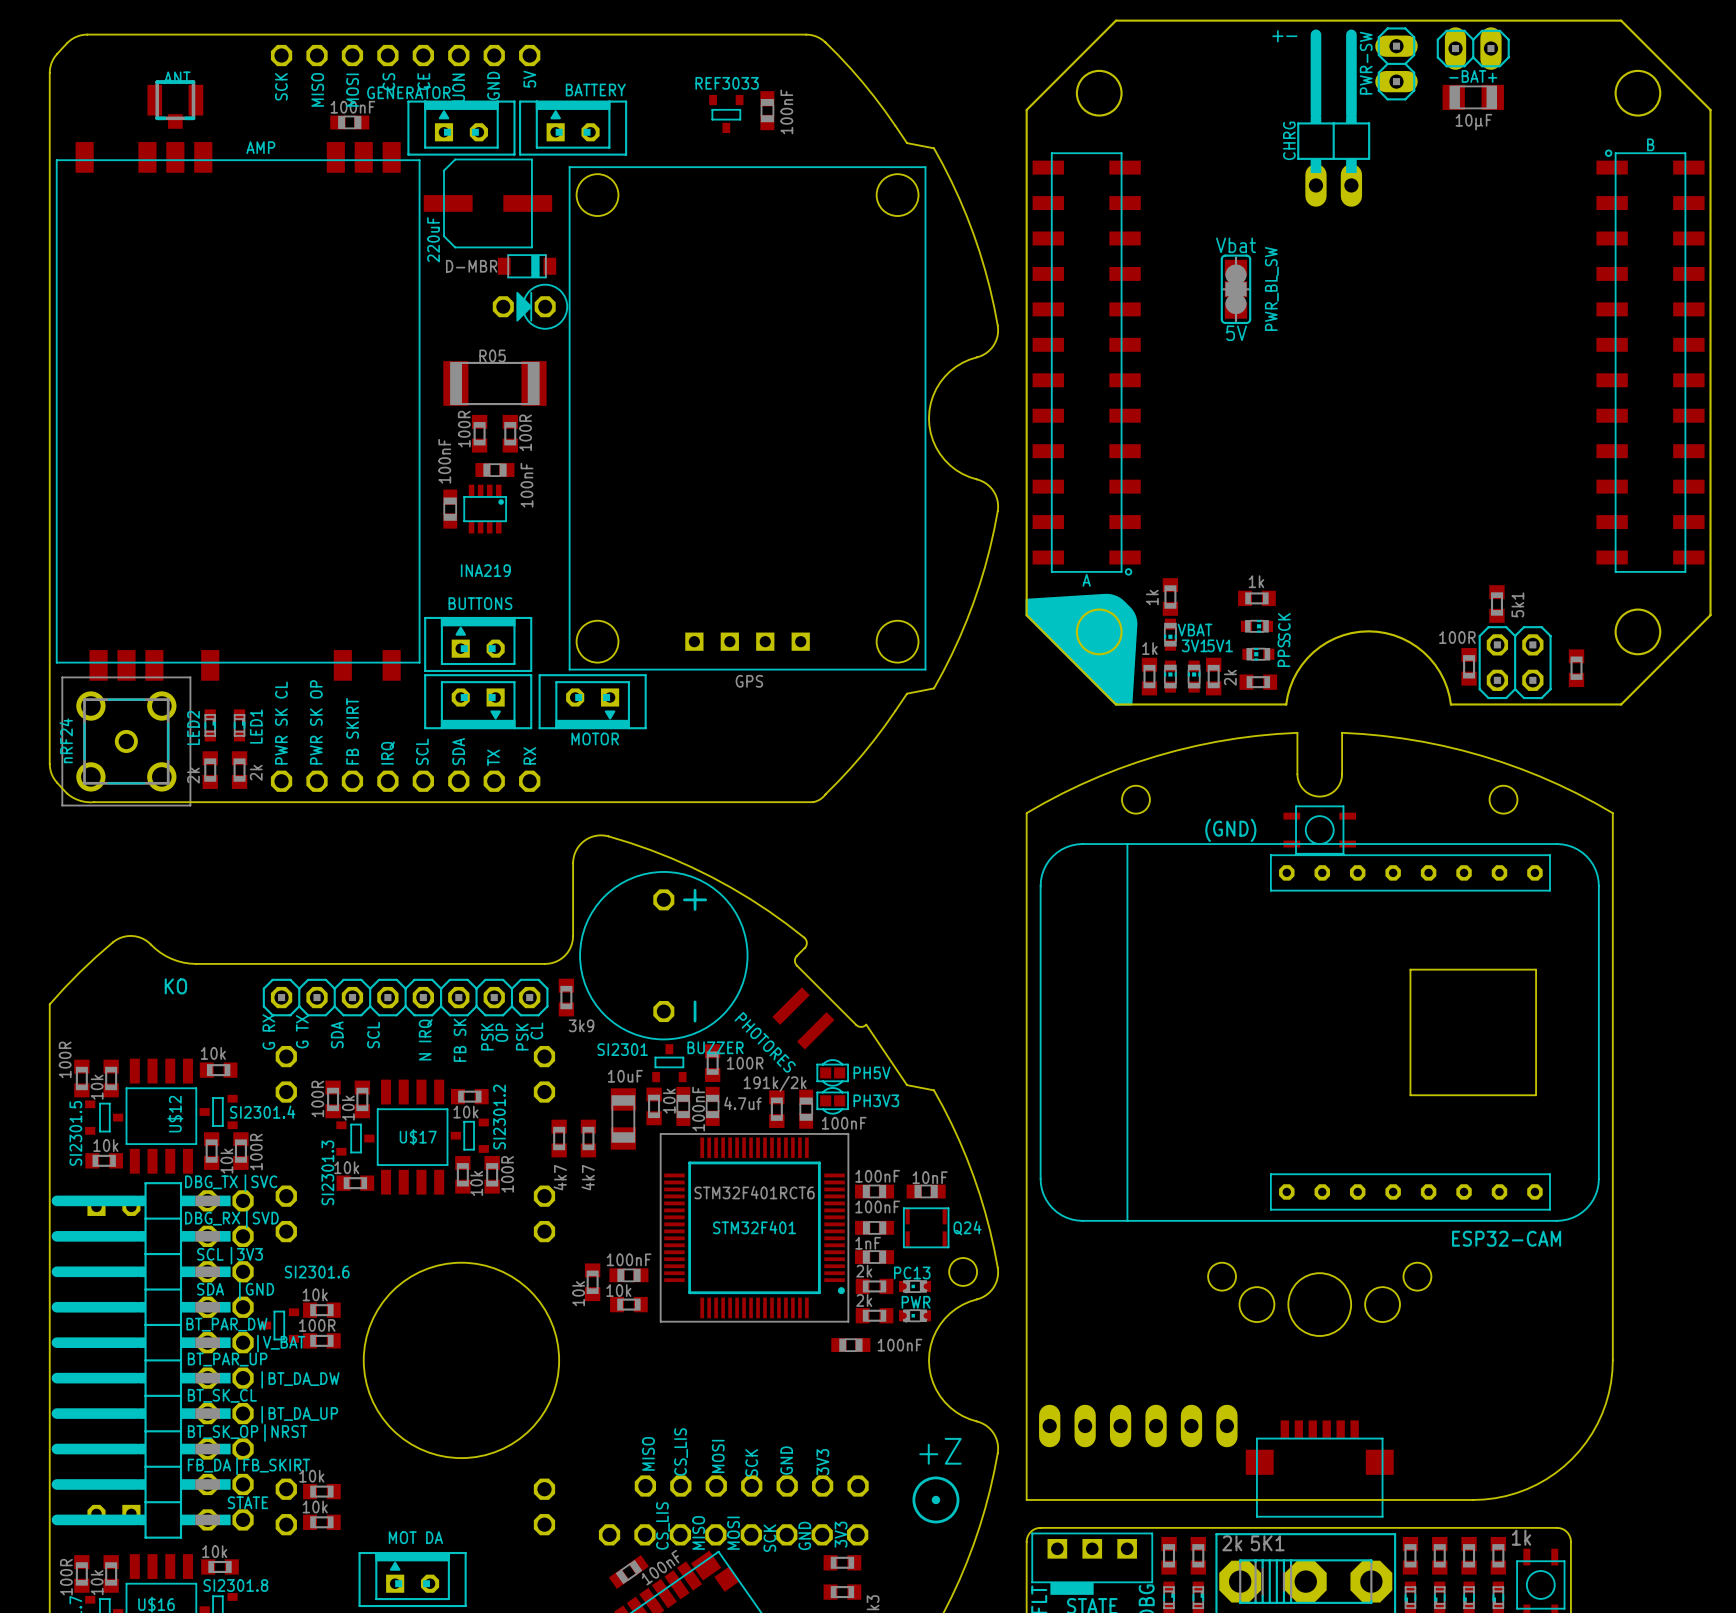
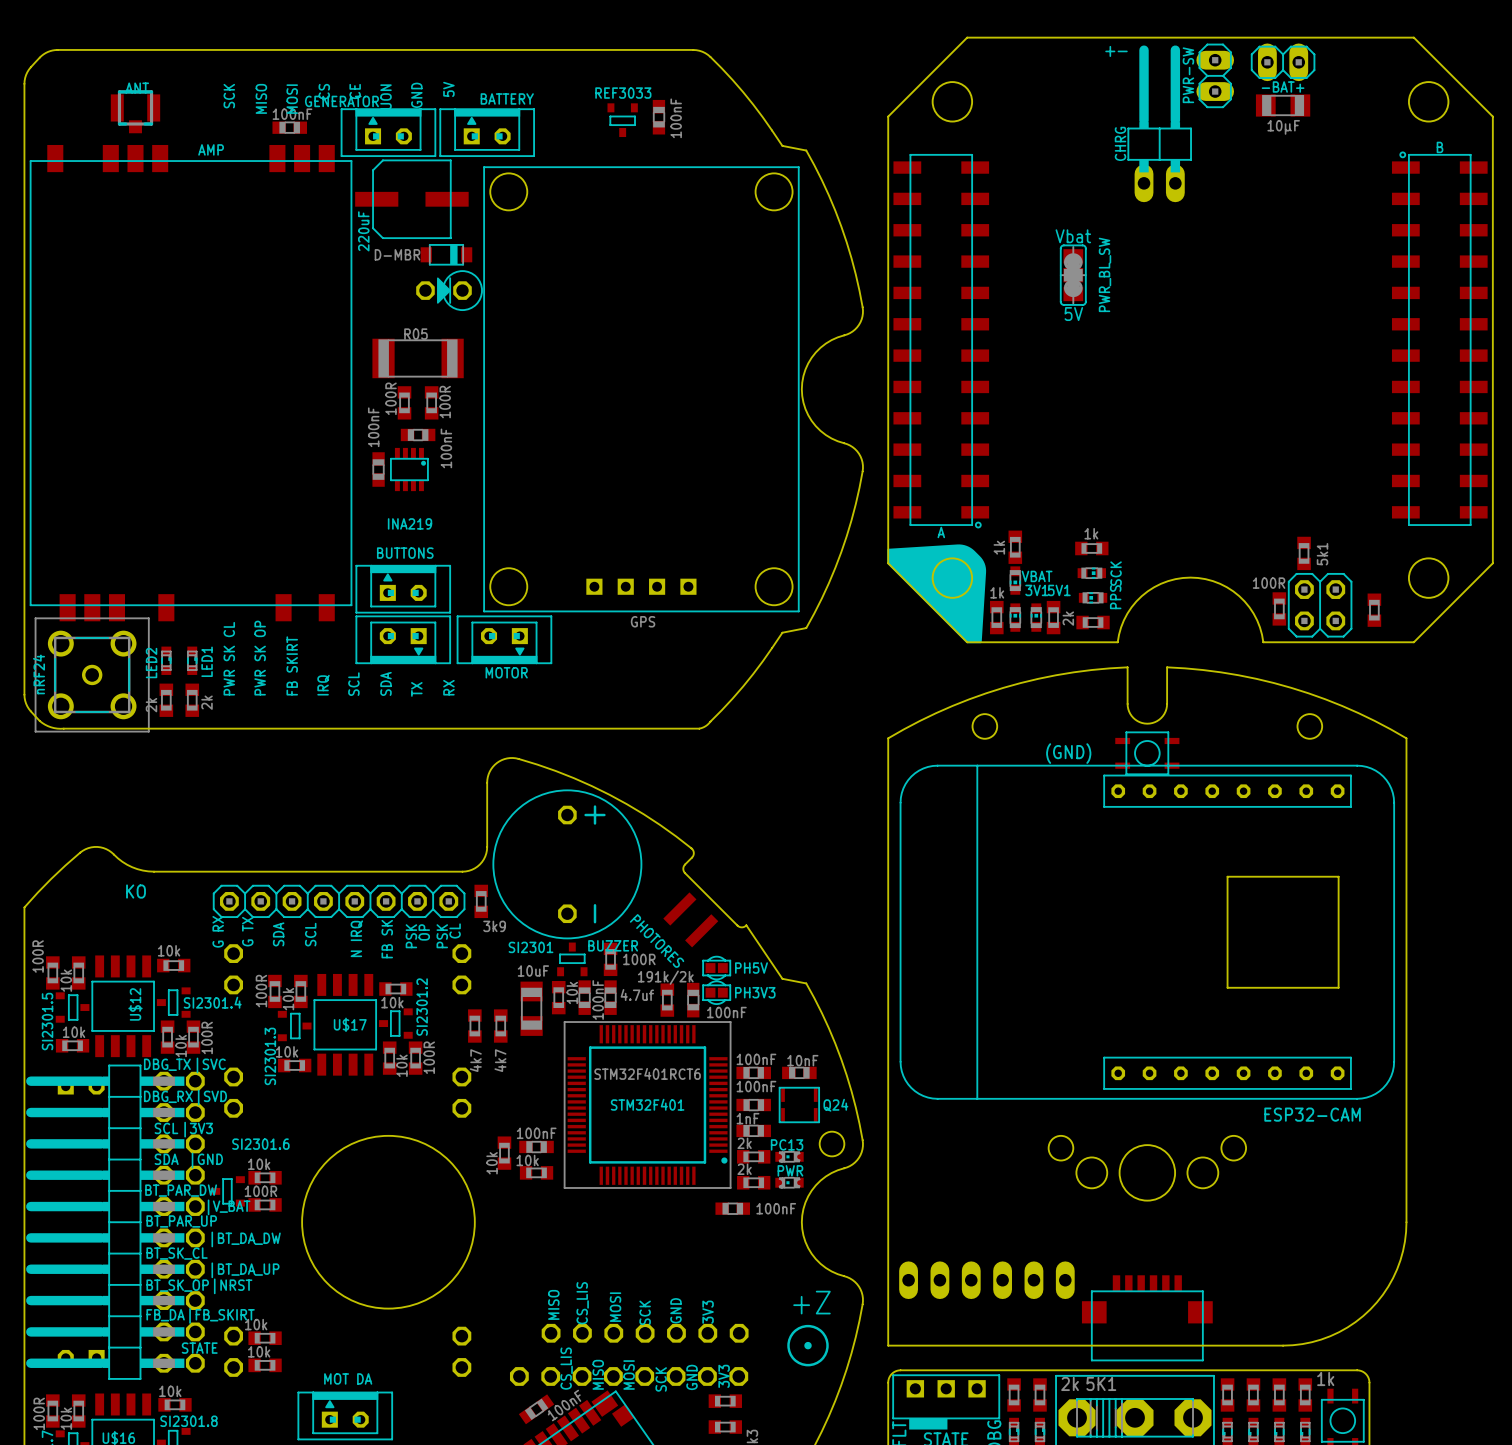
part: (405, 55) -> none
part: (405, 781) -> none

